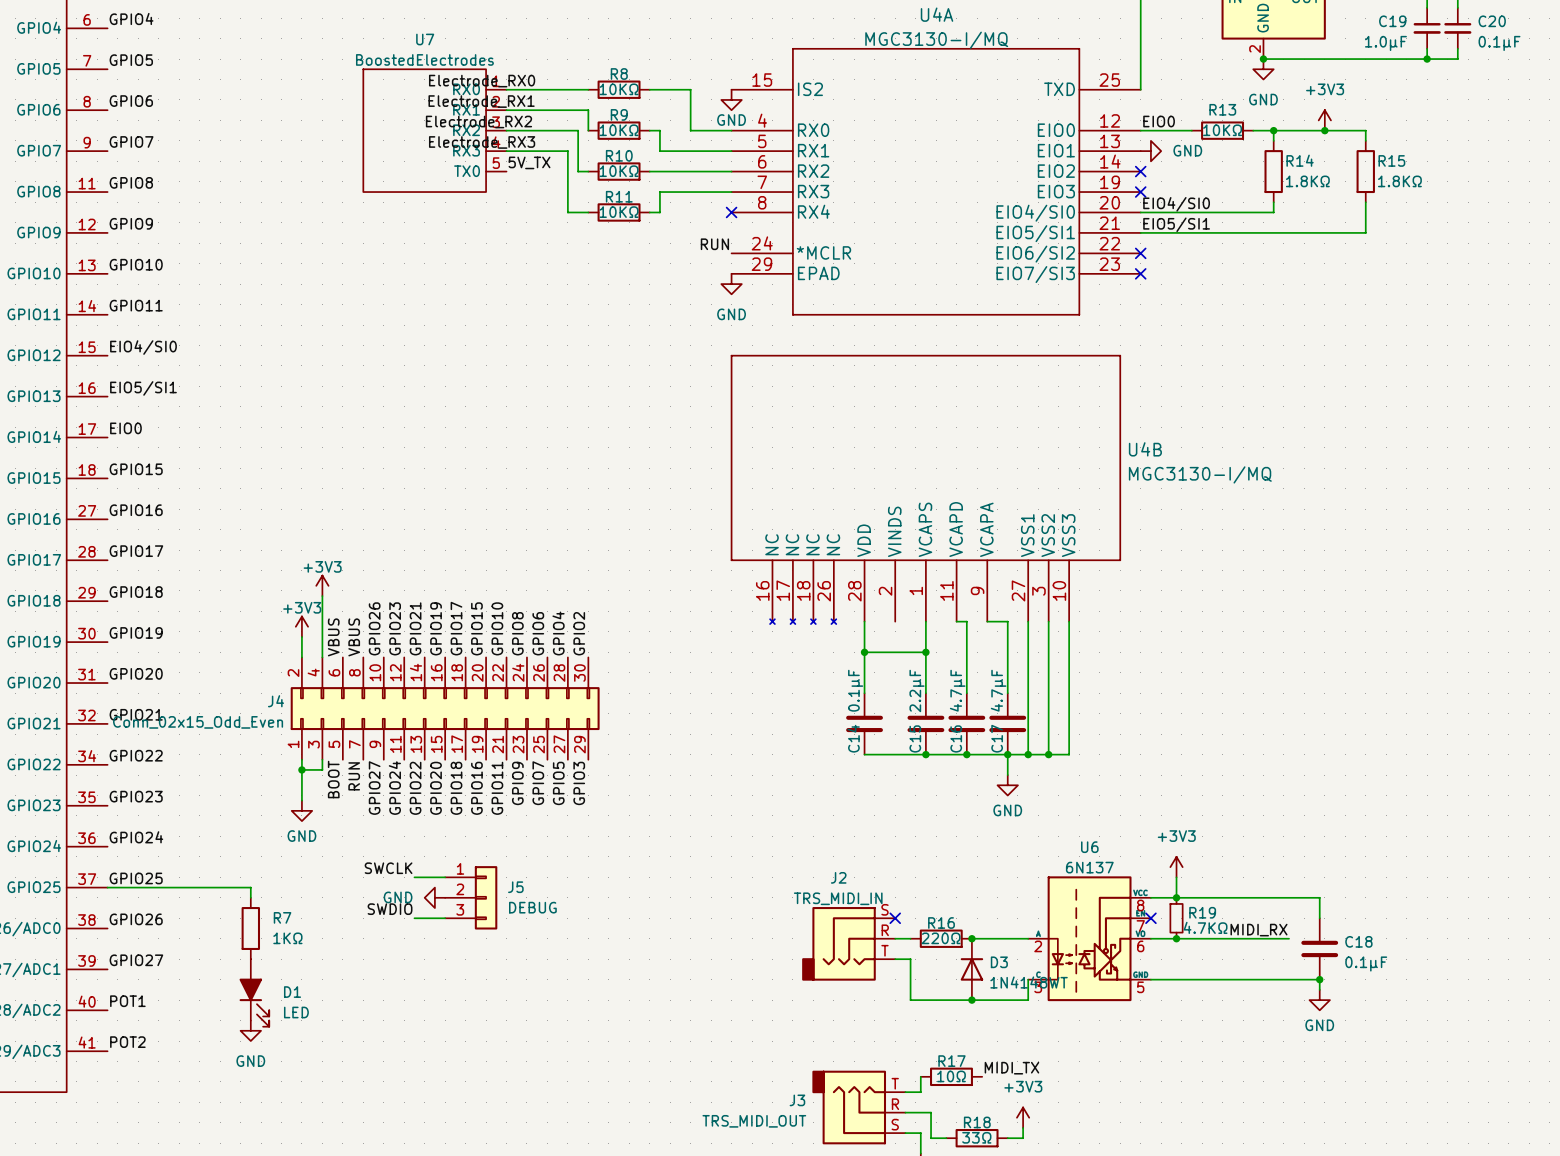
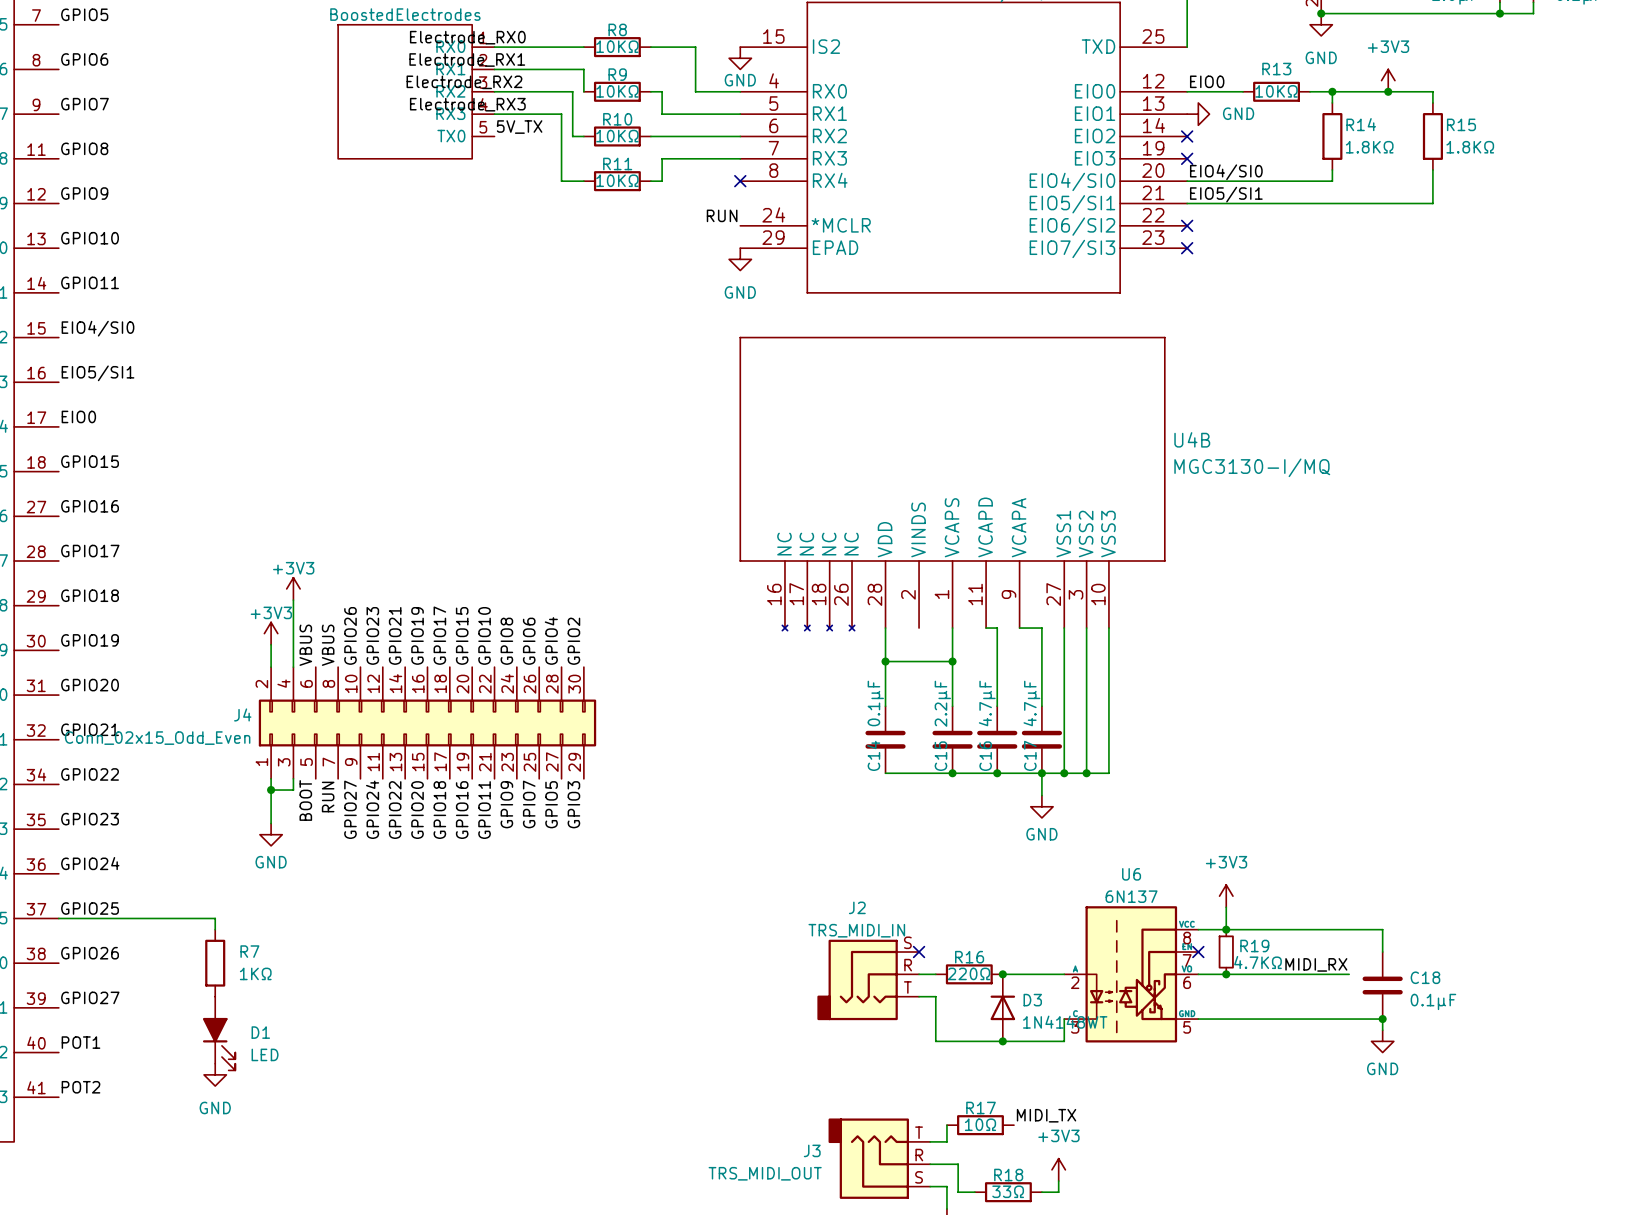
label: SWCLK (388, 868) -> none
wire: (414, 877) (445, 877) -> none
power symbol: GND (434, 897) -> none
J5: DEBUG (471, 897) -> none
label: SWDIO (390, 909) -> none
wire: (414, 918) (445, 918) -> none

